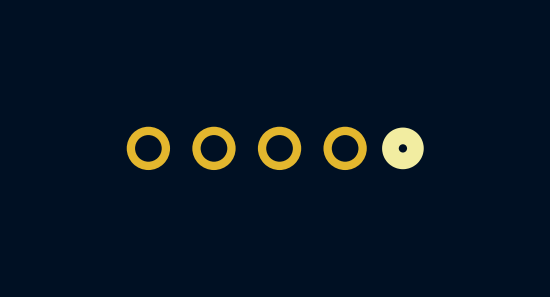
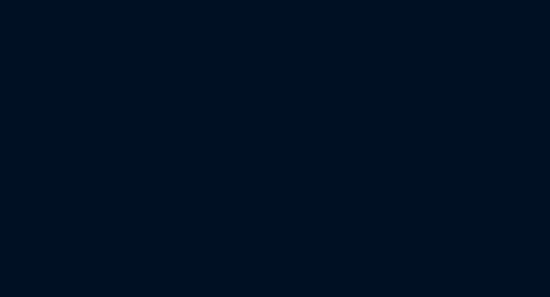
part: (275, 148) -> none

